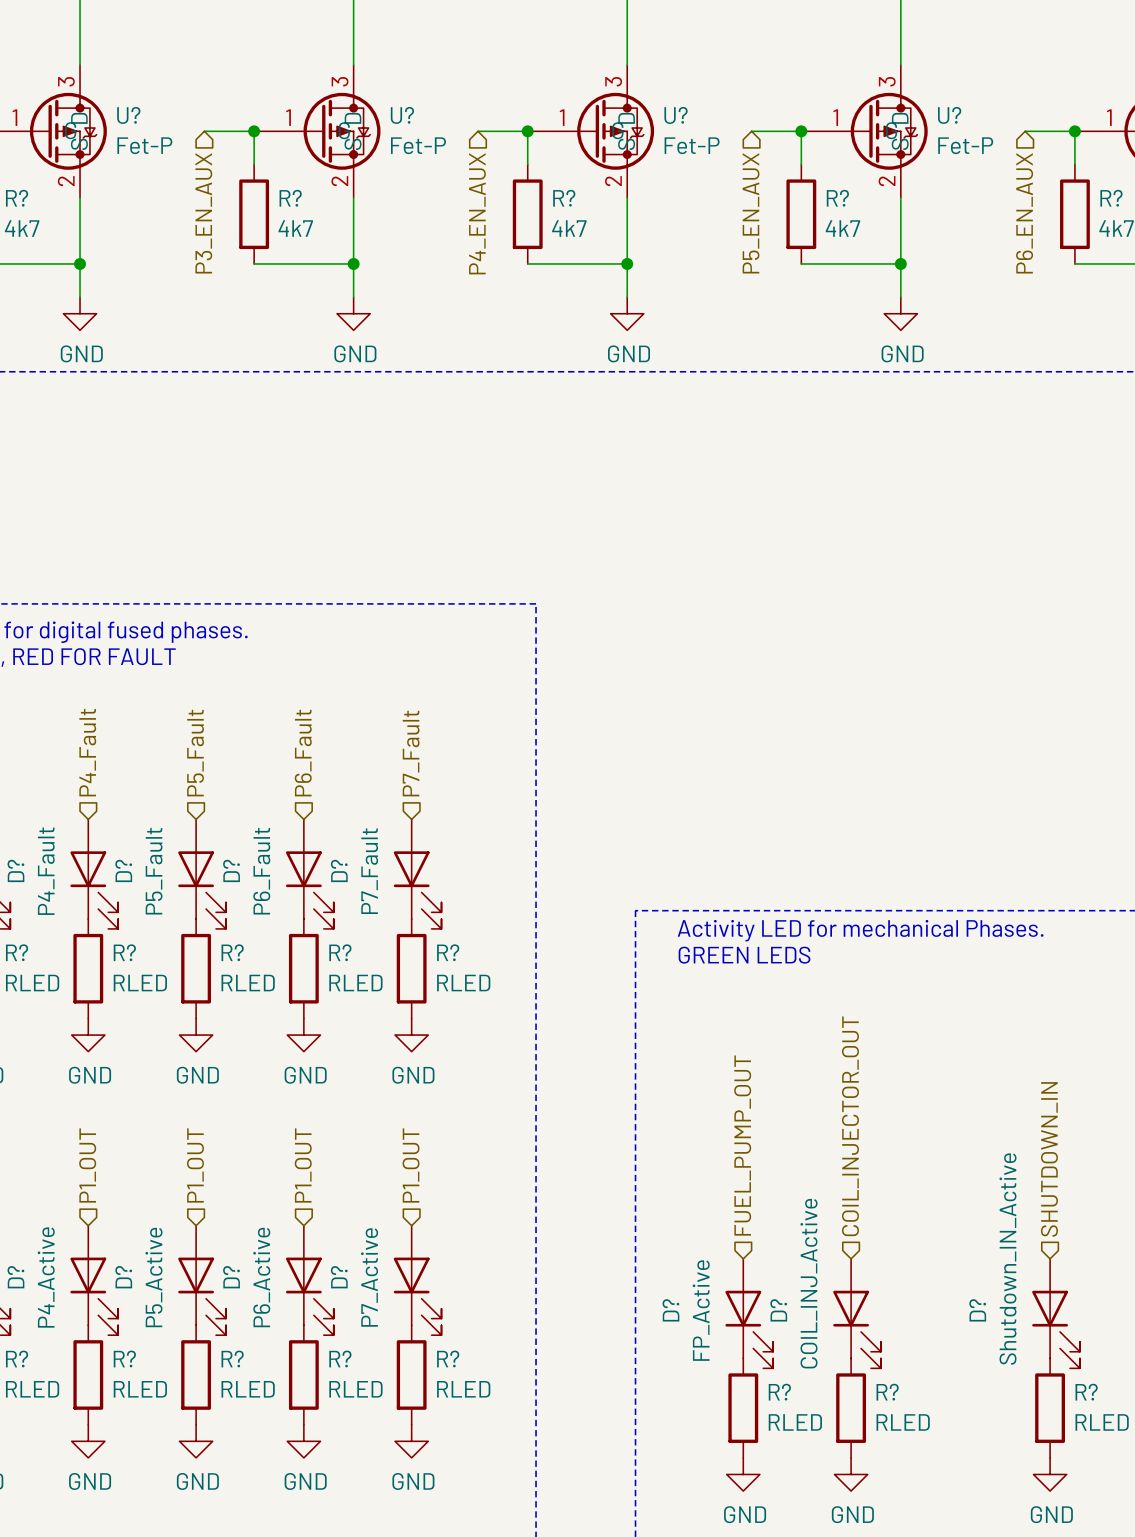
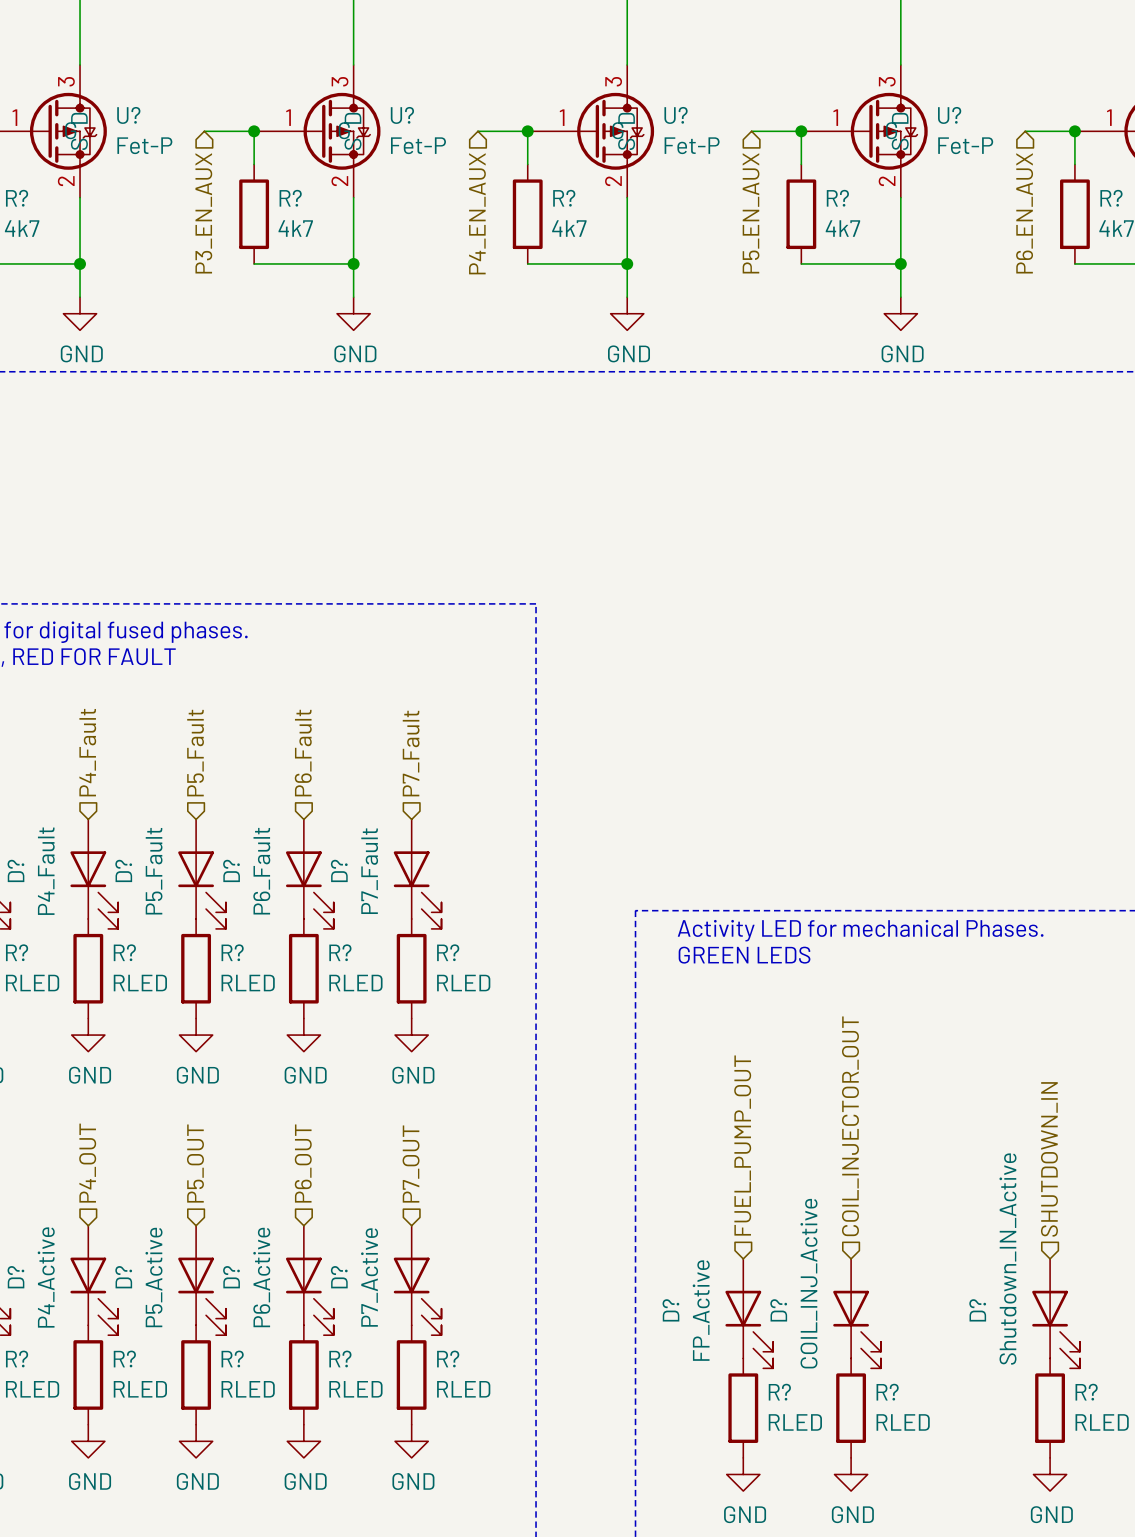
hierarchical label: P1_OUT (87, 1165) -> P4_OUT (87, 1163)
hierarchical label: P1_OUT (195, 1165) -> P5_OUT (195, 1163)
hierarchical label: P1_OUT (303, 1165) -> P6_OUT (303, 1163)
hierarchical label: P1_OUT (411, 1165) -> P7_OUT (411, 1164)

